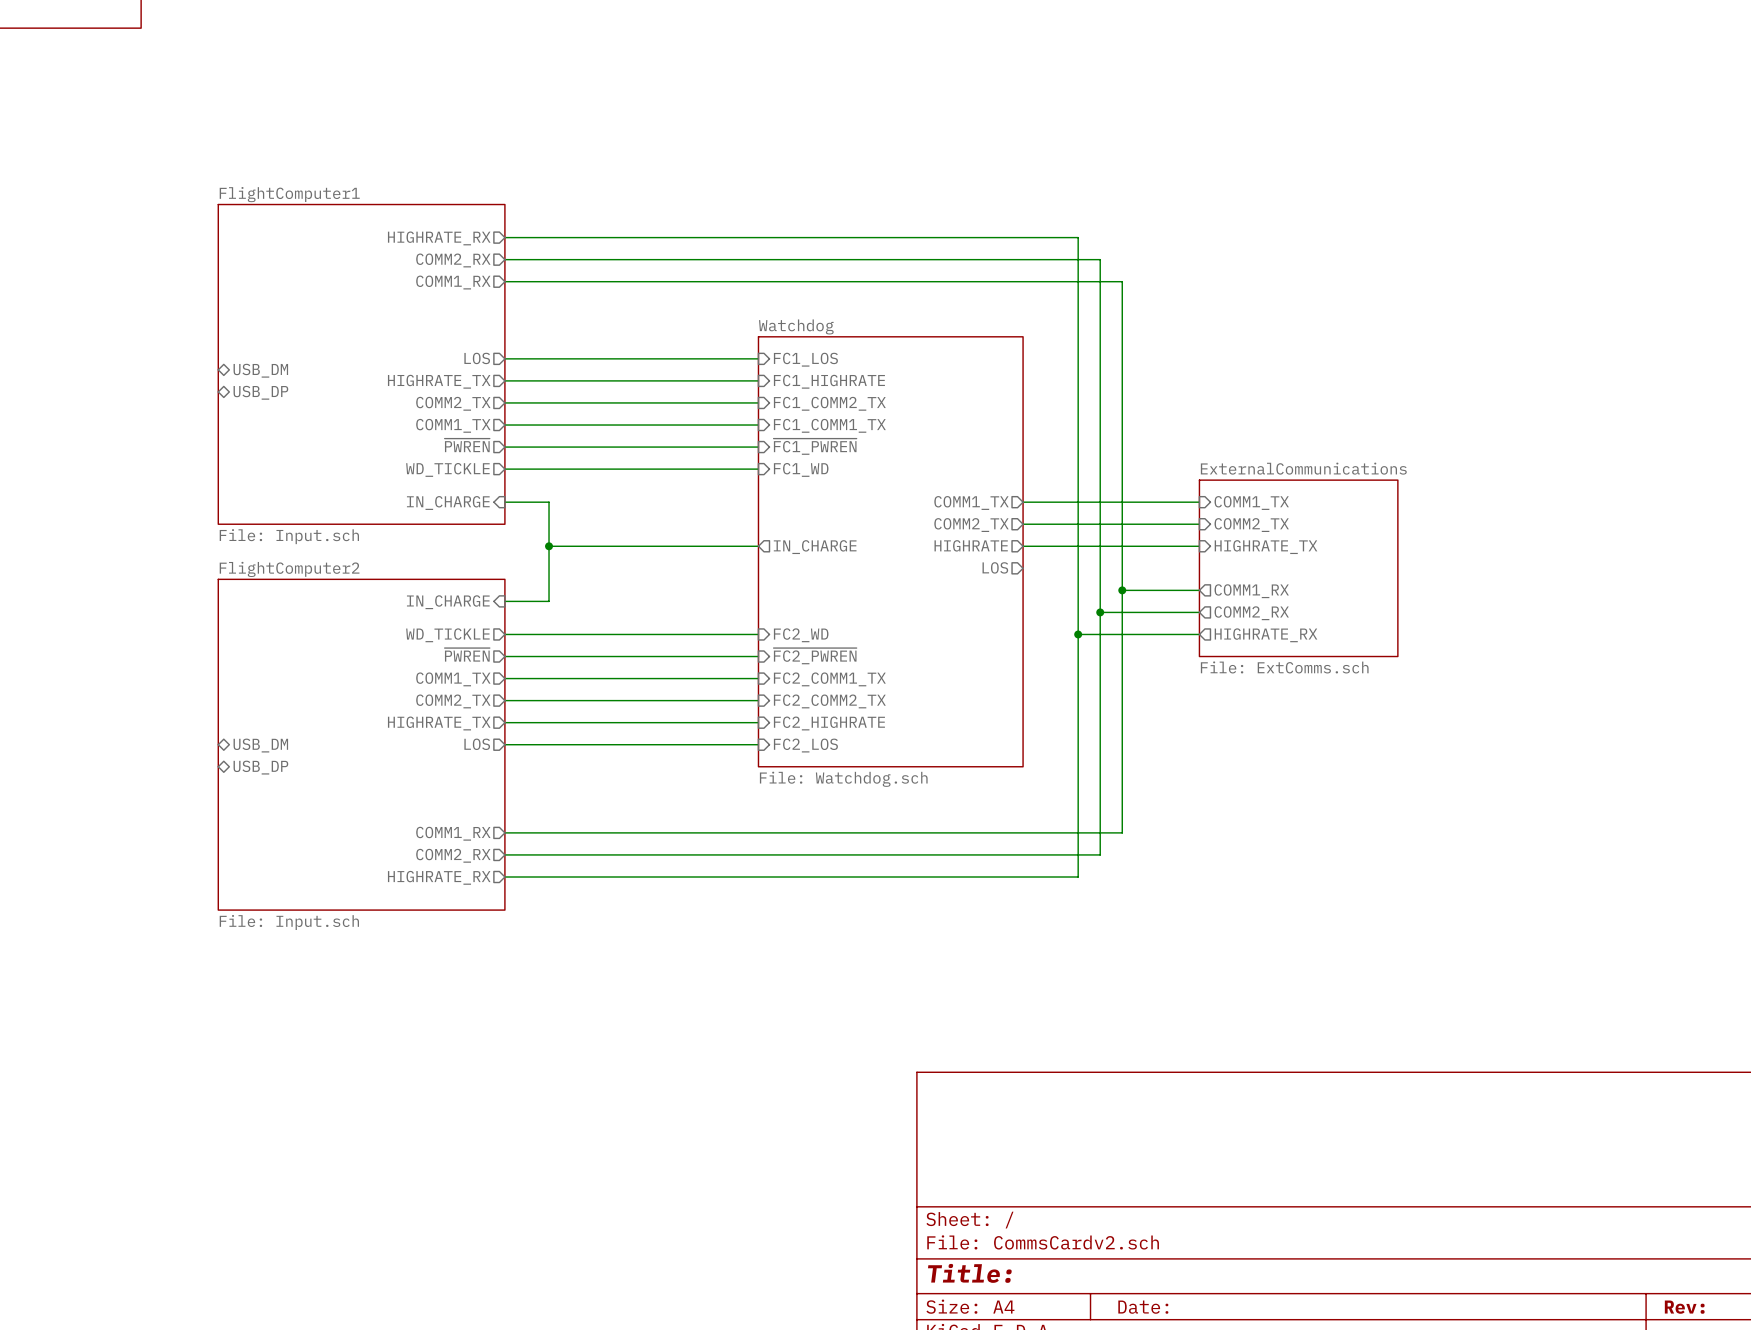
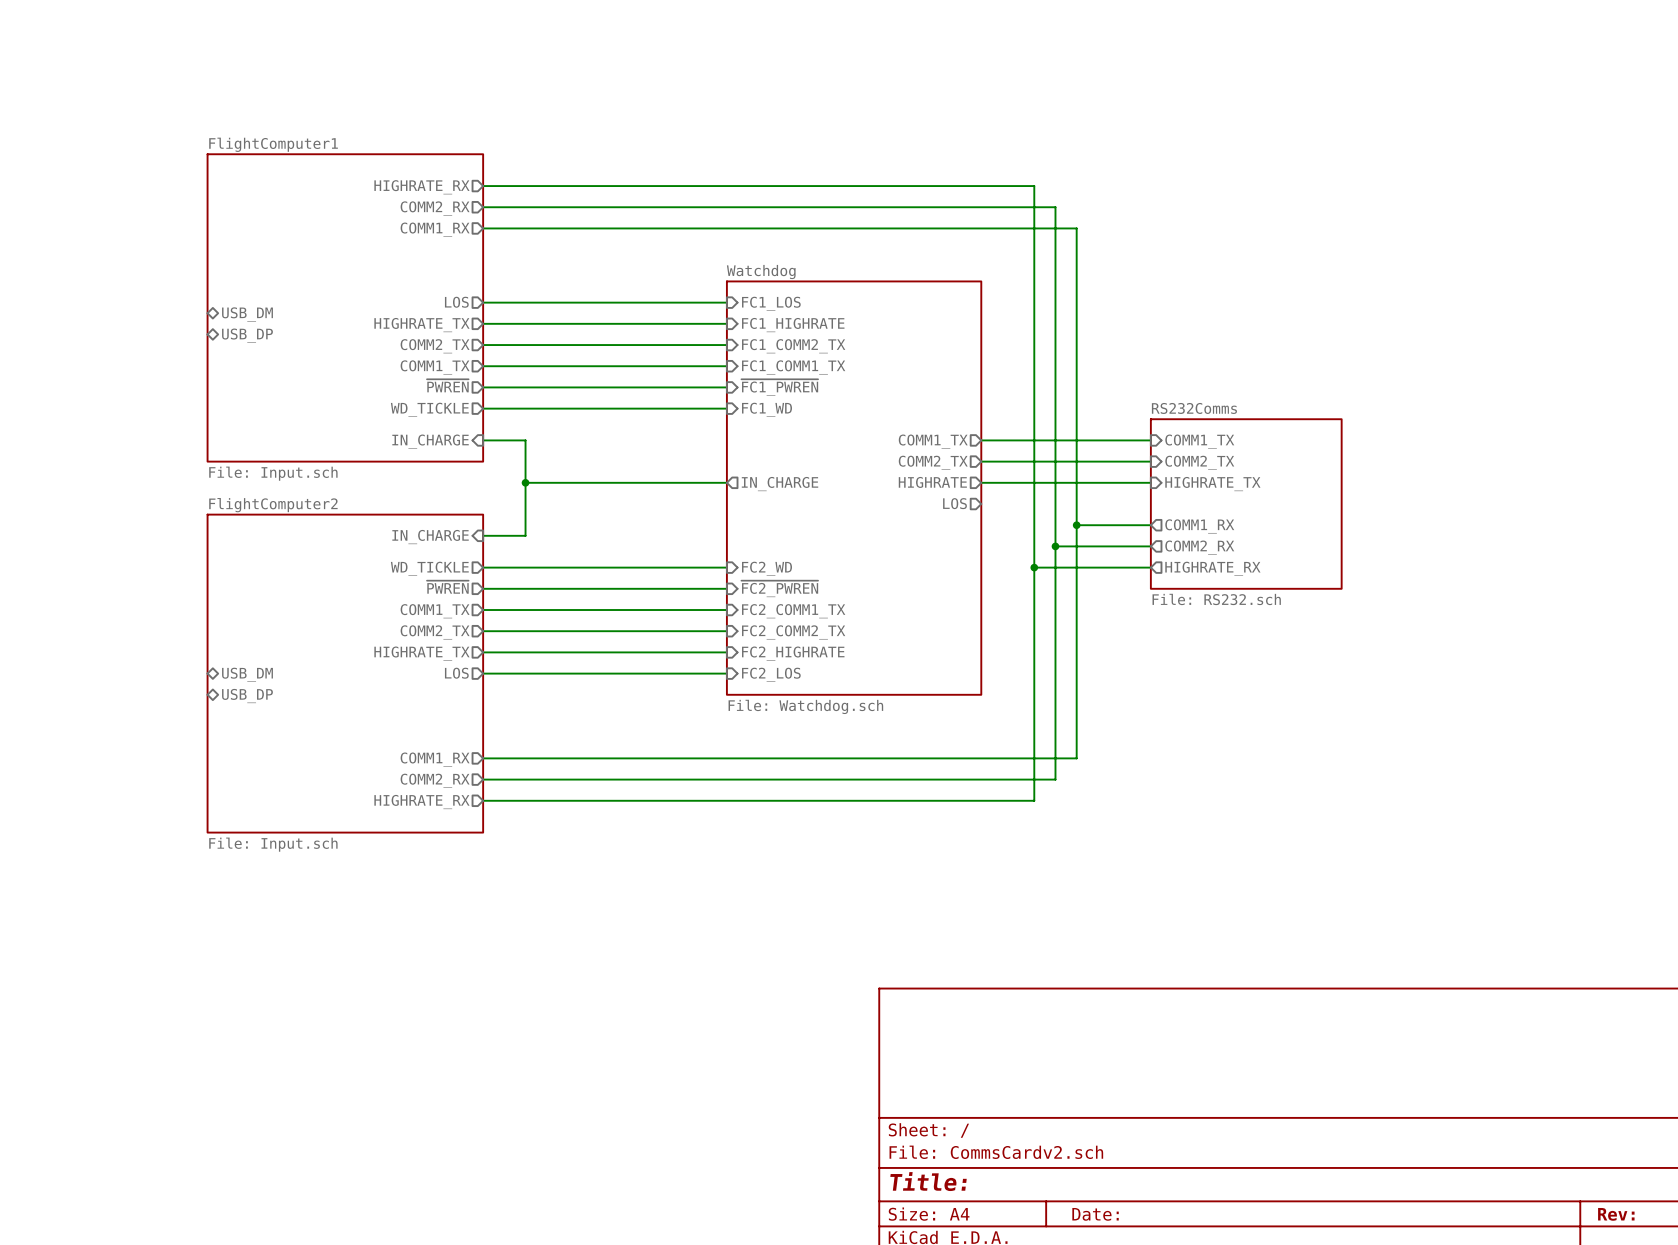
sheet ExternalCommunications name: ExternalCommunications (1303, 468) -> RS232Comms (1194, 408)
sheet ExternalCommunications value: File: ExtComms.sch (1284, 667) -> File: RS232.sch (1216, 599)

